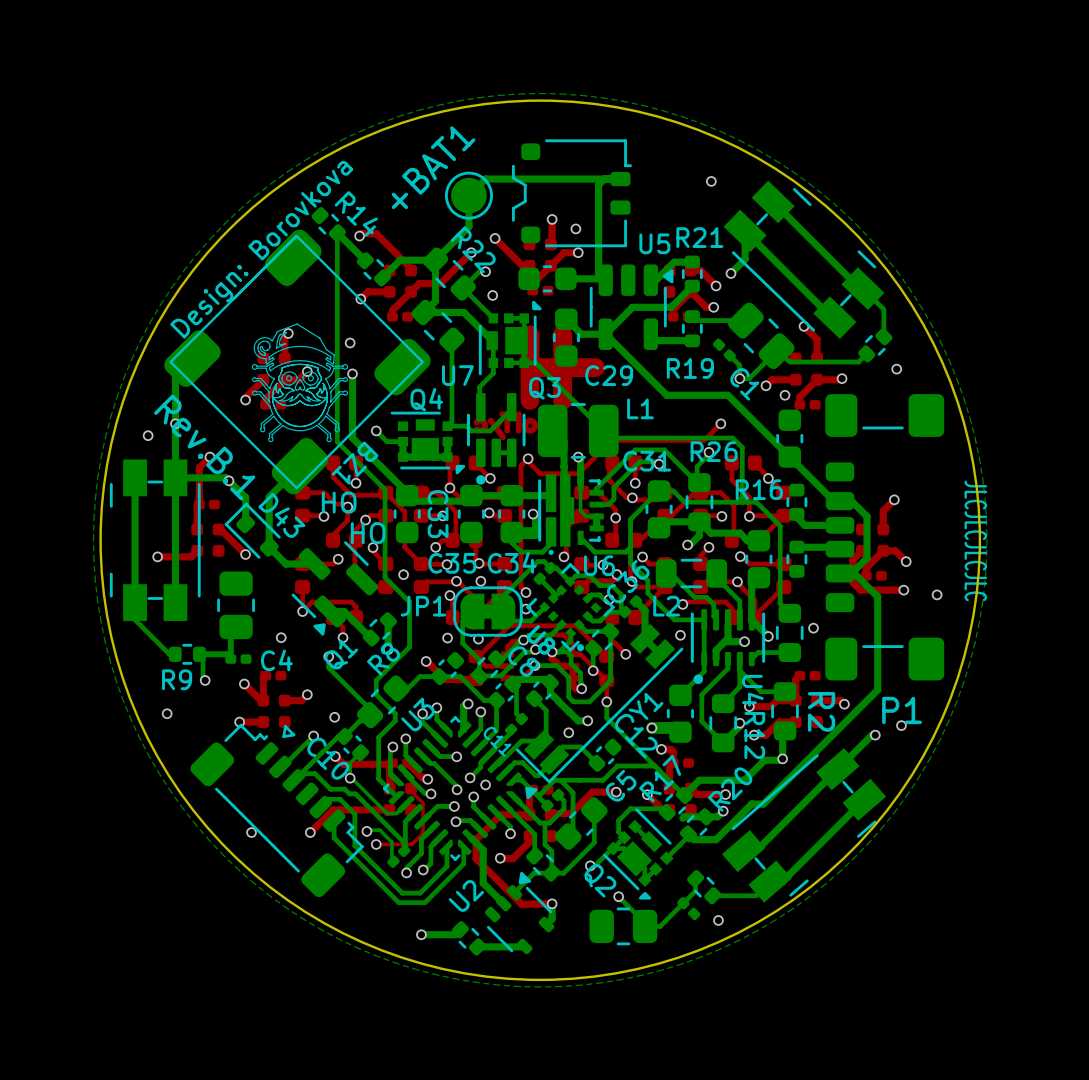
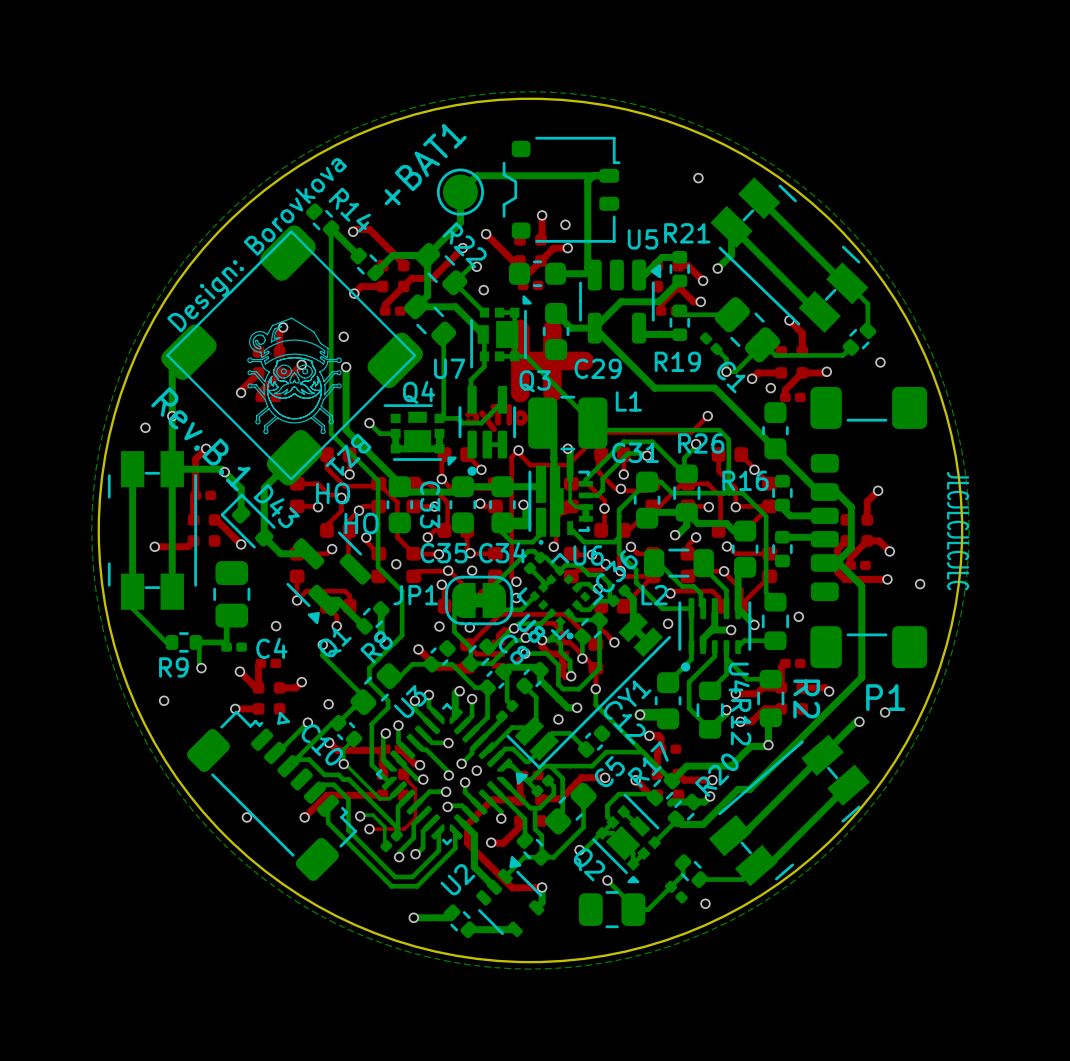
C11 name: C11 (497, 741) -> none

